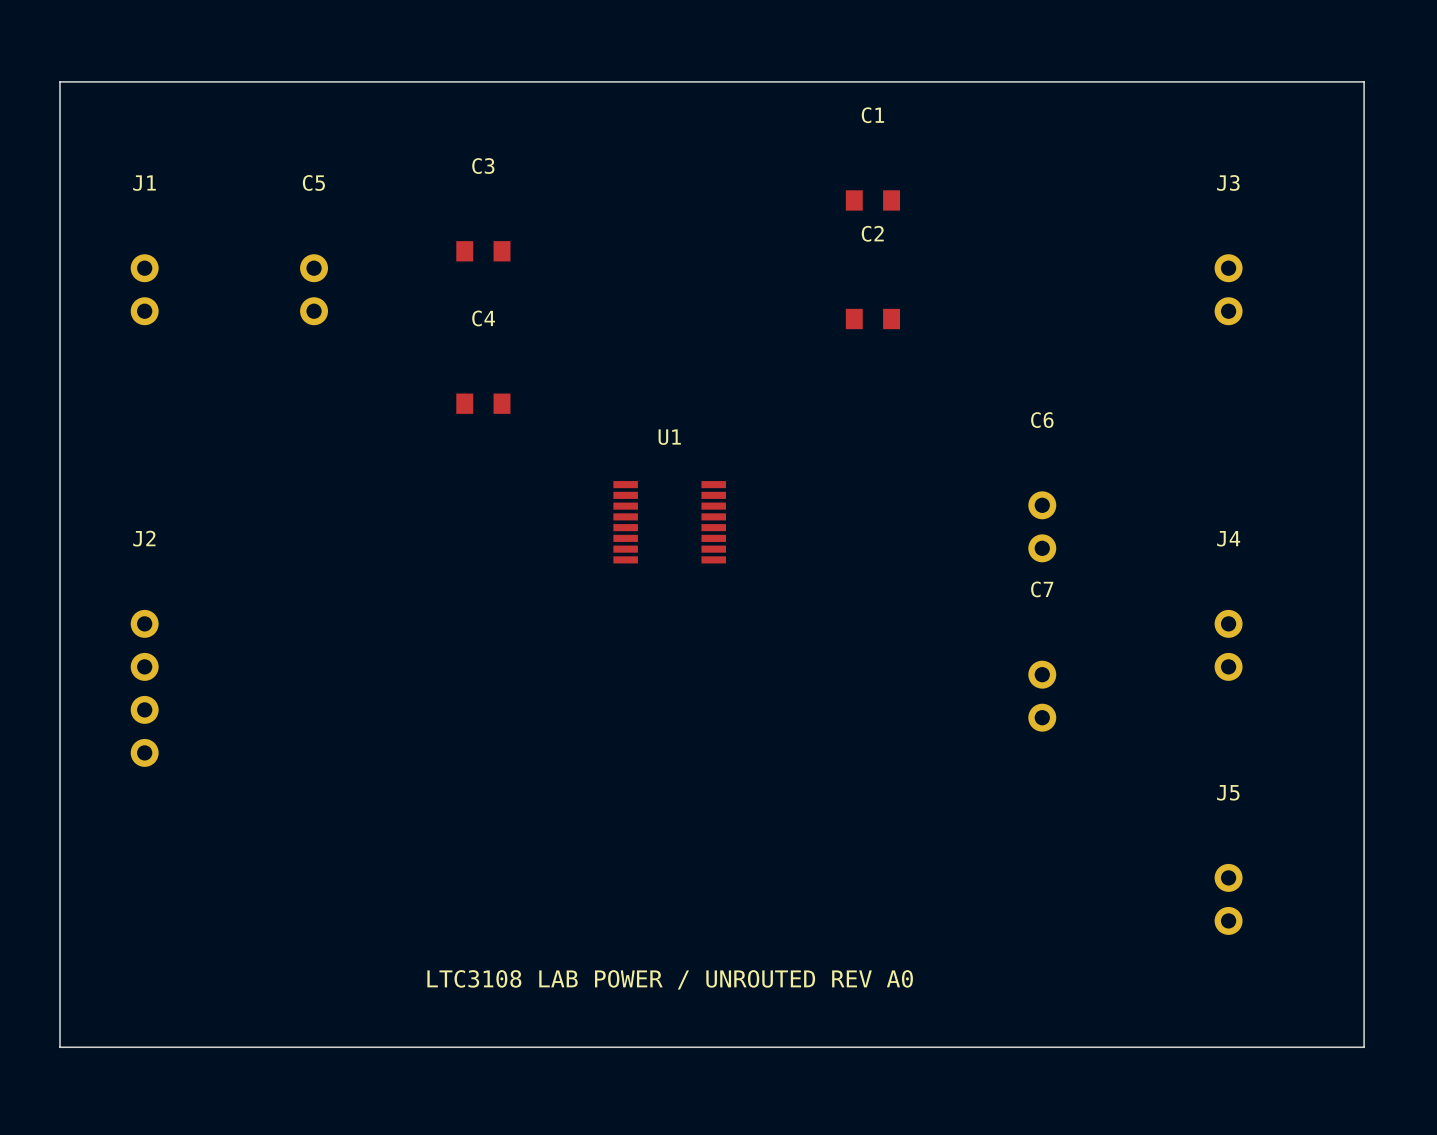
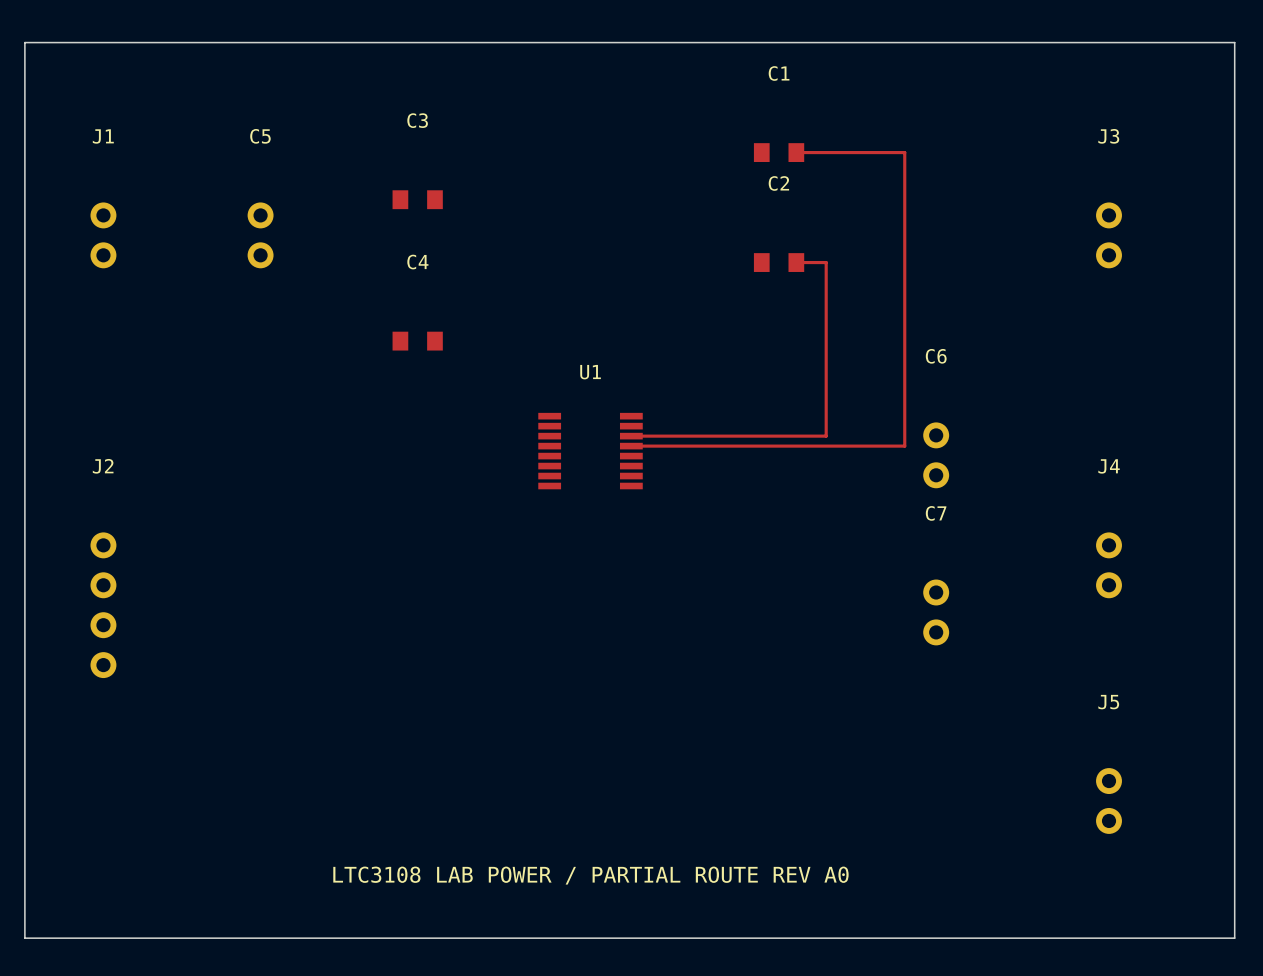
track: none -> (796, 152) (904, 152) (904, 446) (631, 446)
track: none -> (796, 262) (826, 262) (826, 436) (631, 436)
text: LTC3108 LAB POWER / UNROUTED REV A0 (670, 979) -> LTC3108 LAB POWER / PARTIAL ROUTE REV A0 (590, 875)

